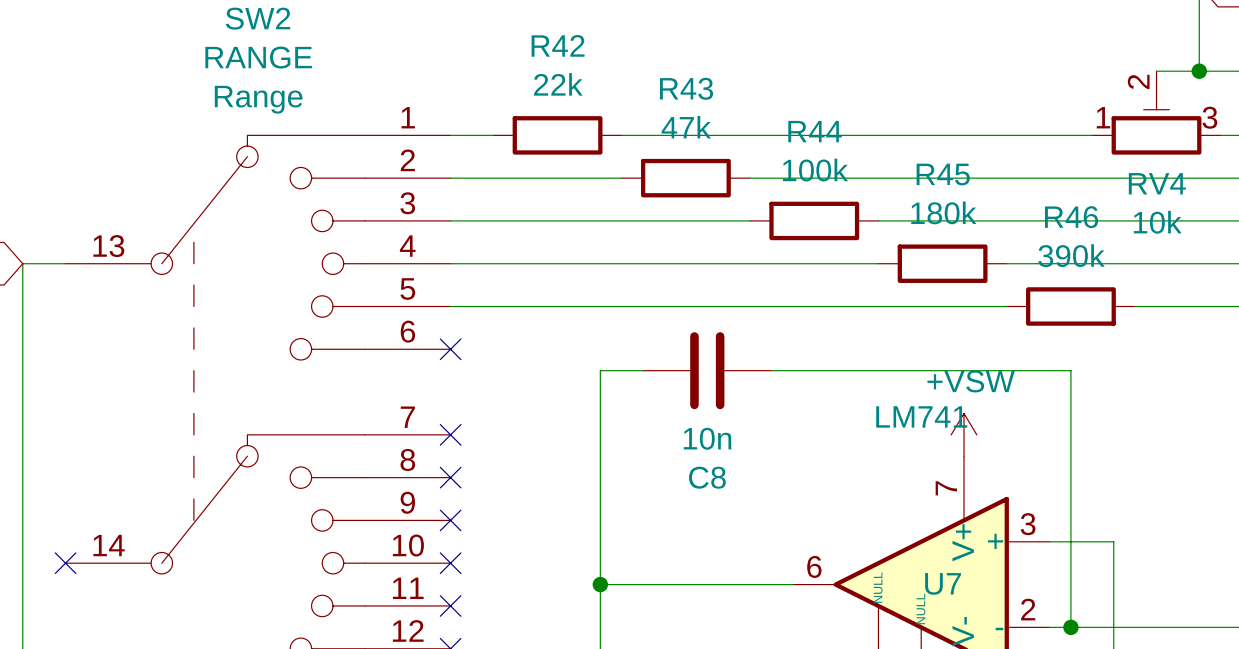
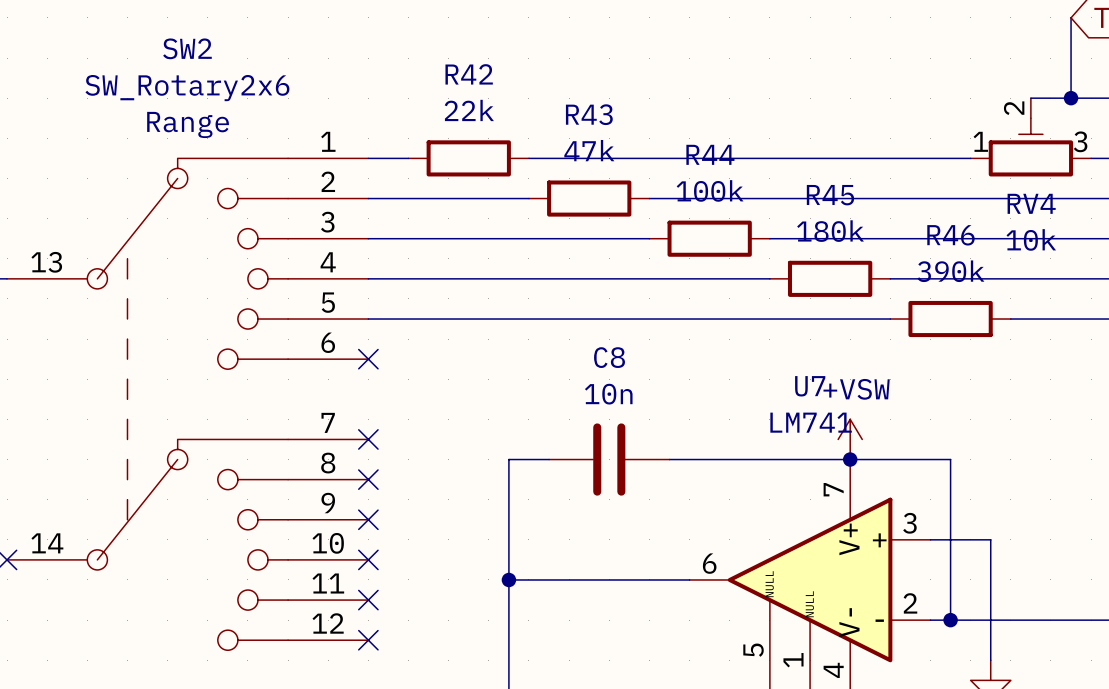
SW2 value: RANGE (258, 57) -> SW_Rotary2x6 (187, 88)
wire: (643, 370) (600, 370) (600, 456) -> (549, 459) (508, 459)
C8 position: (707, 370) -> (609, 459)
wire: (771, 370) (1070, 370) (1070, 456) -> (669, 459) (950, 459)
C8 value position: 10n (707, 438) -> 10n (608, 394)
junction: none -> (850, 459)
C8 name position: C8 (707, 477) -> C8 (609, 357)
U7 name position: U7 (943, 583) -> U7 (810, 386)

